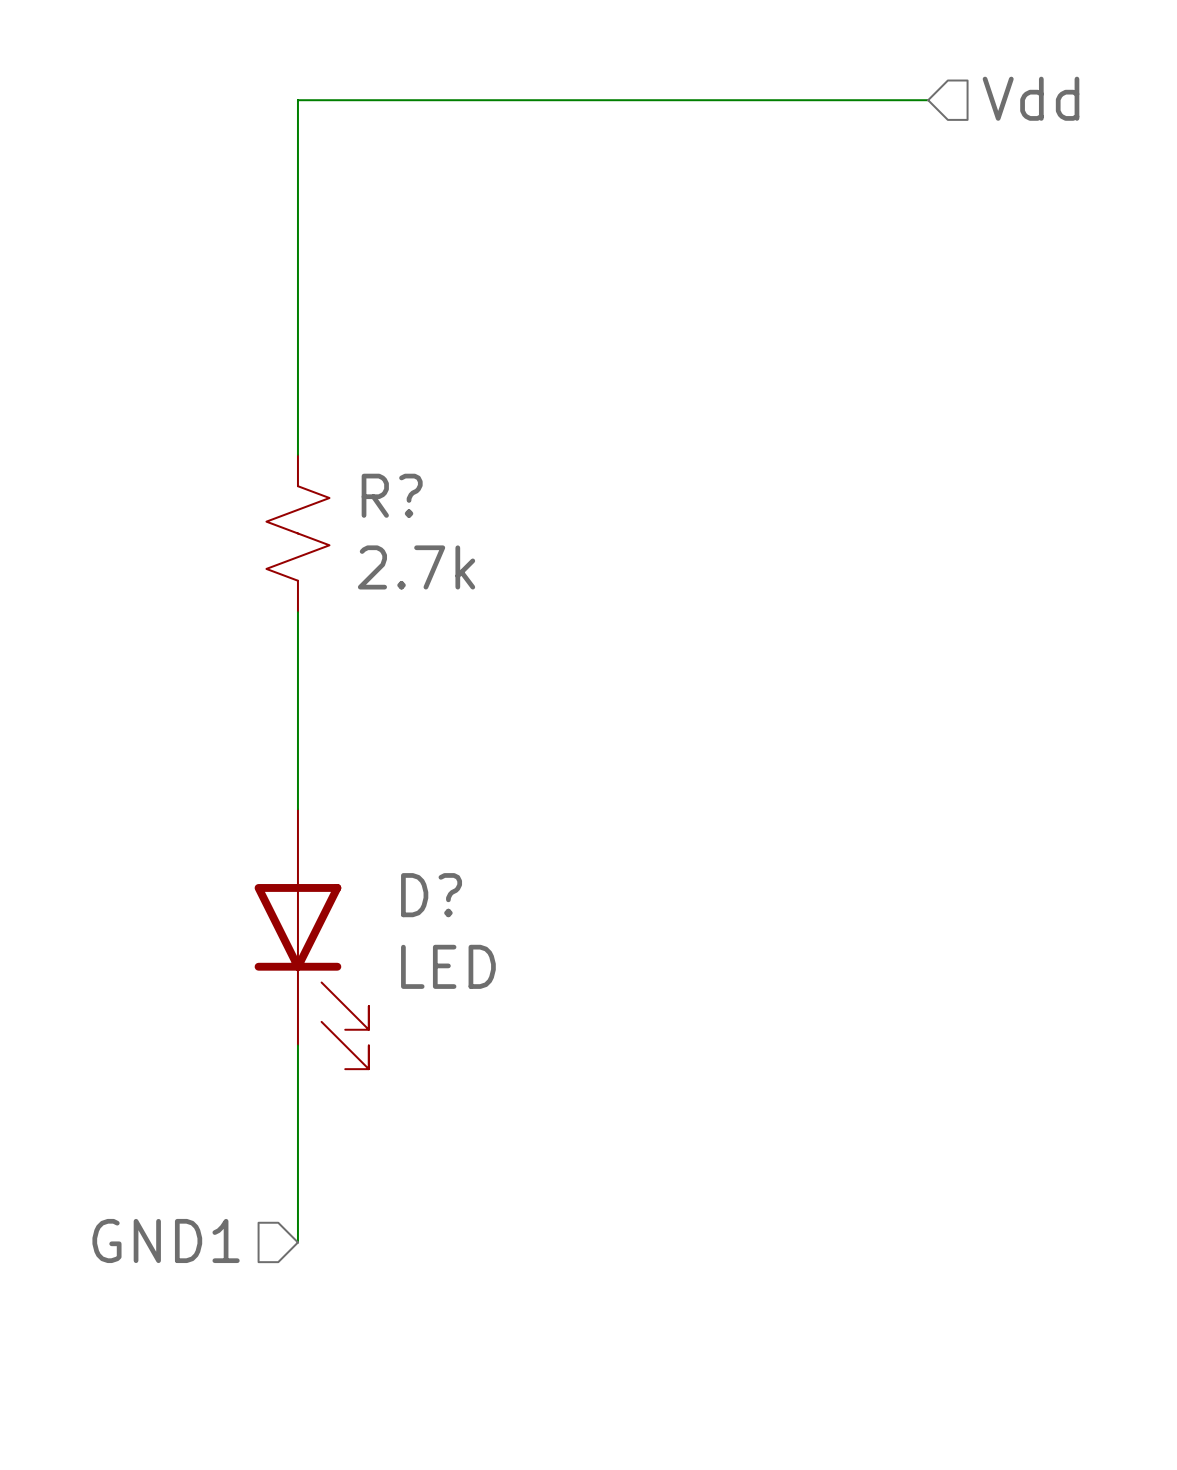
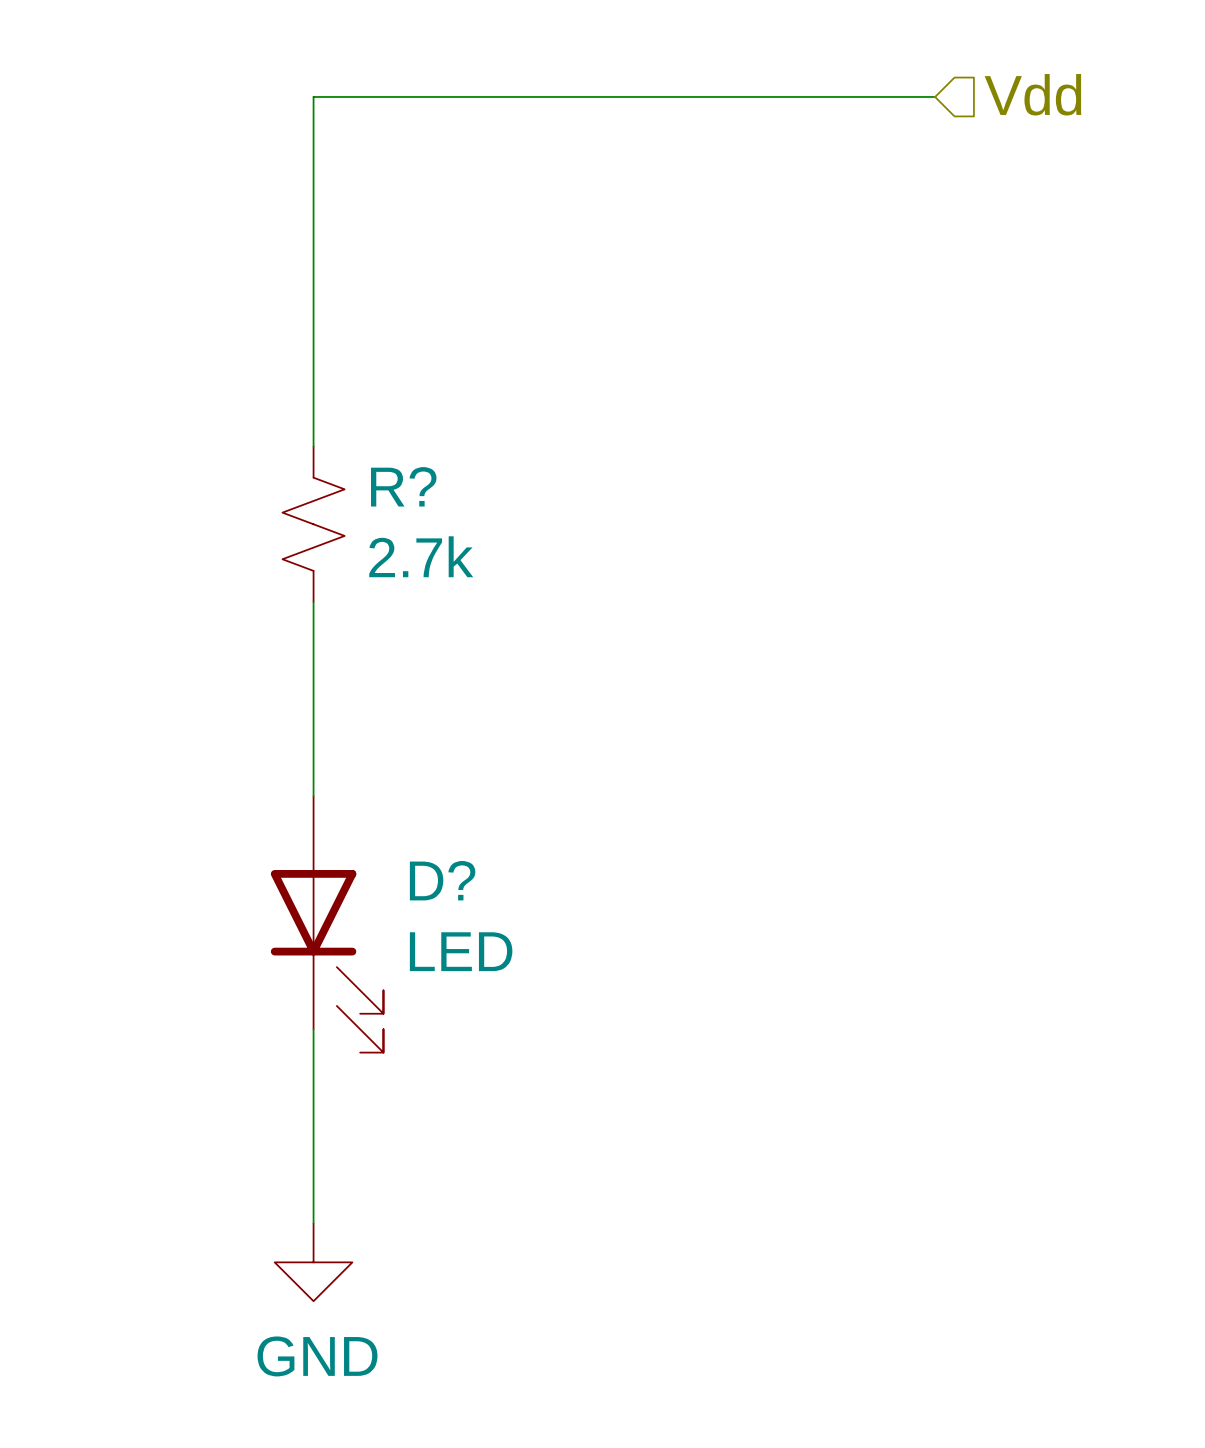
hierarchical label: GND1 (166, 1240) -> none
power symbol: none -> GND (313, 1262)

